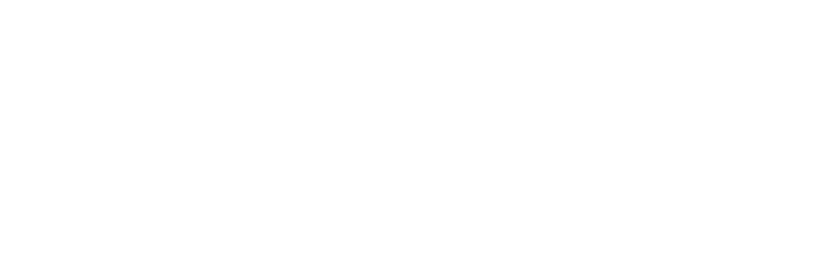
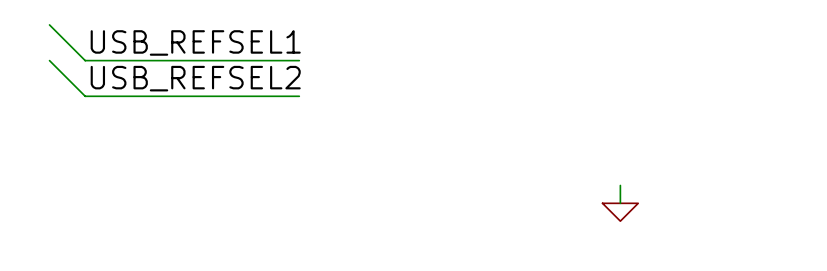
wire: none -> (49, 24) (85, 60) (299, 60)
label: none -> USB_REFSEL1 (195, 42)
wire: none -> (49, 60) (85, 96) (299, 96)
label: none -> USB_REFSEL2 (195, 78)
wire: none -> (620, 185) (620, 203)
power symbol: none -> (620, 212)

